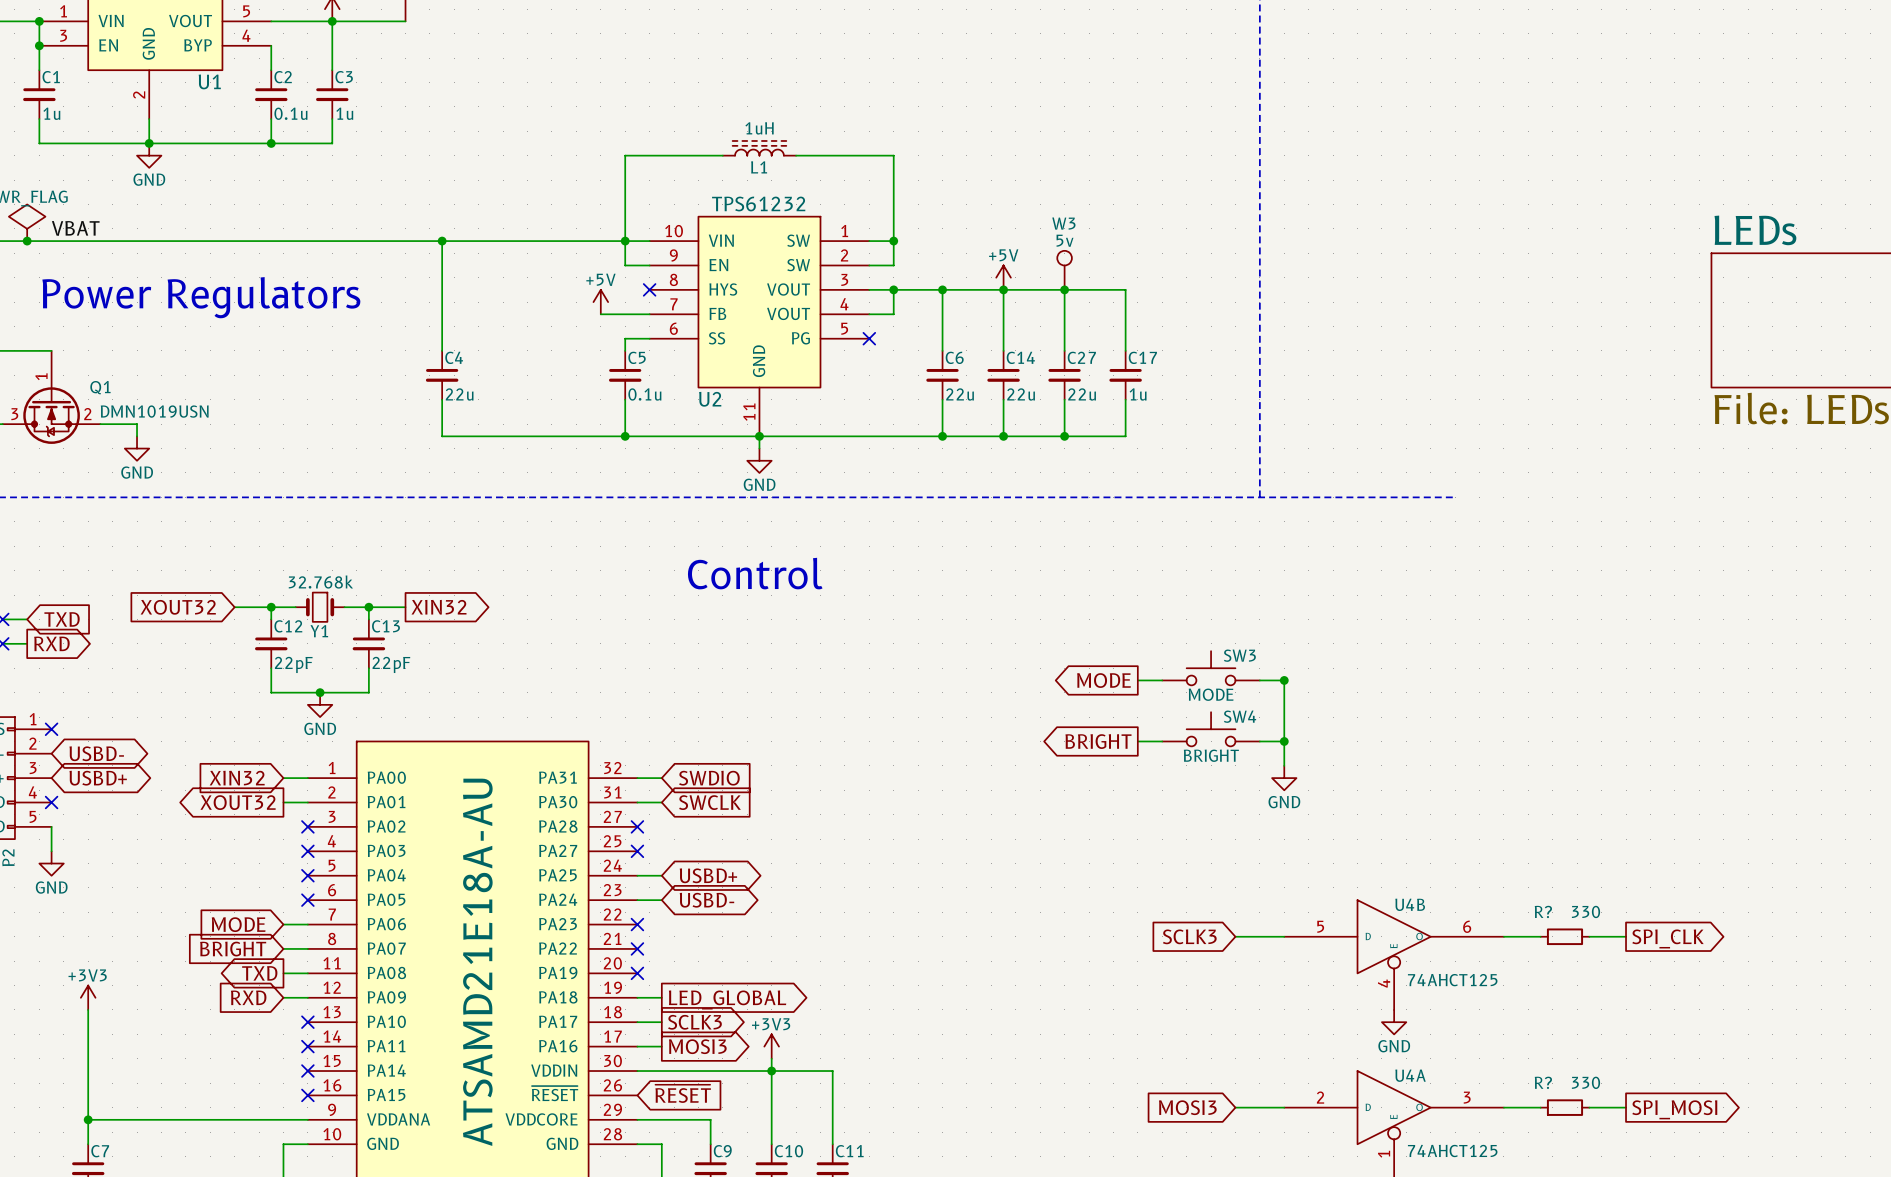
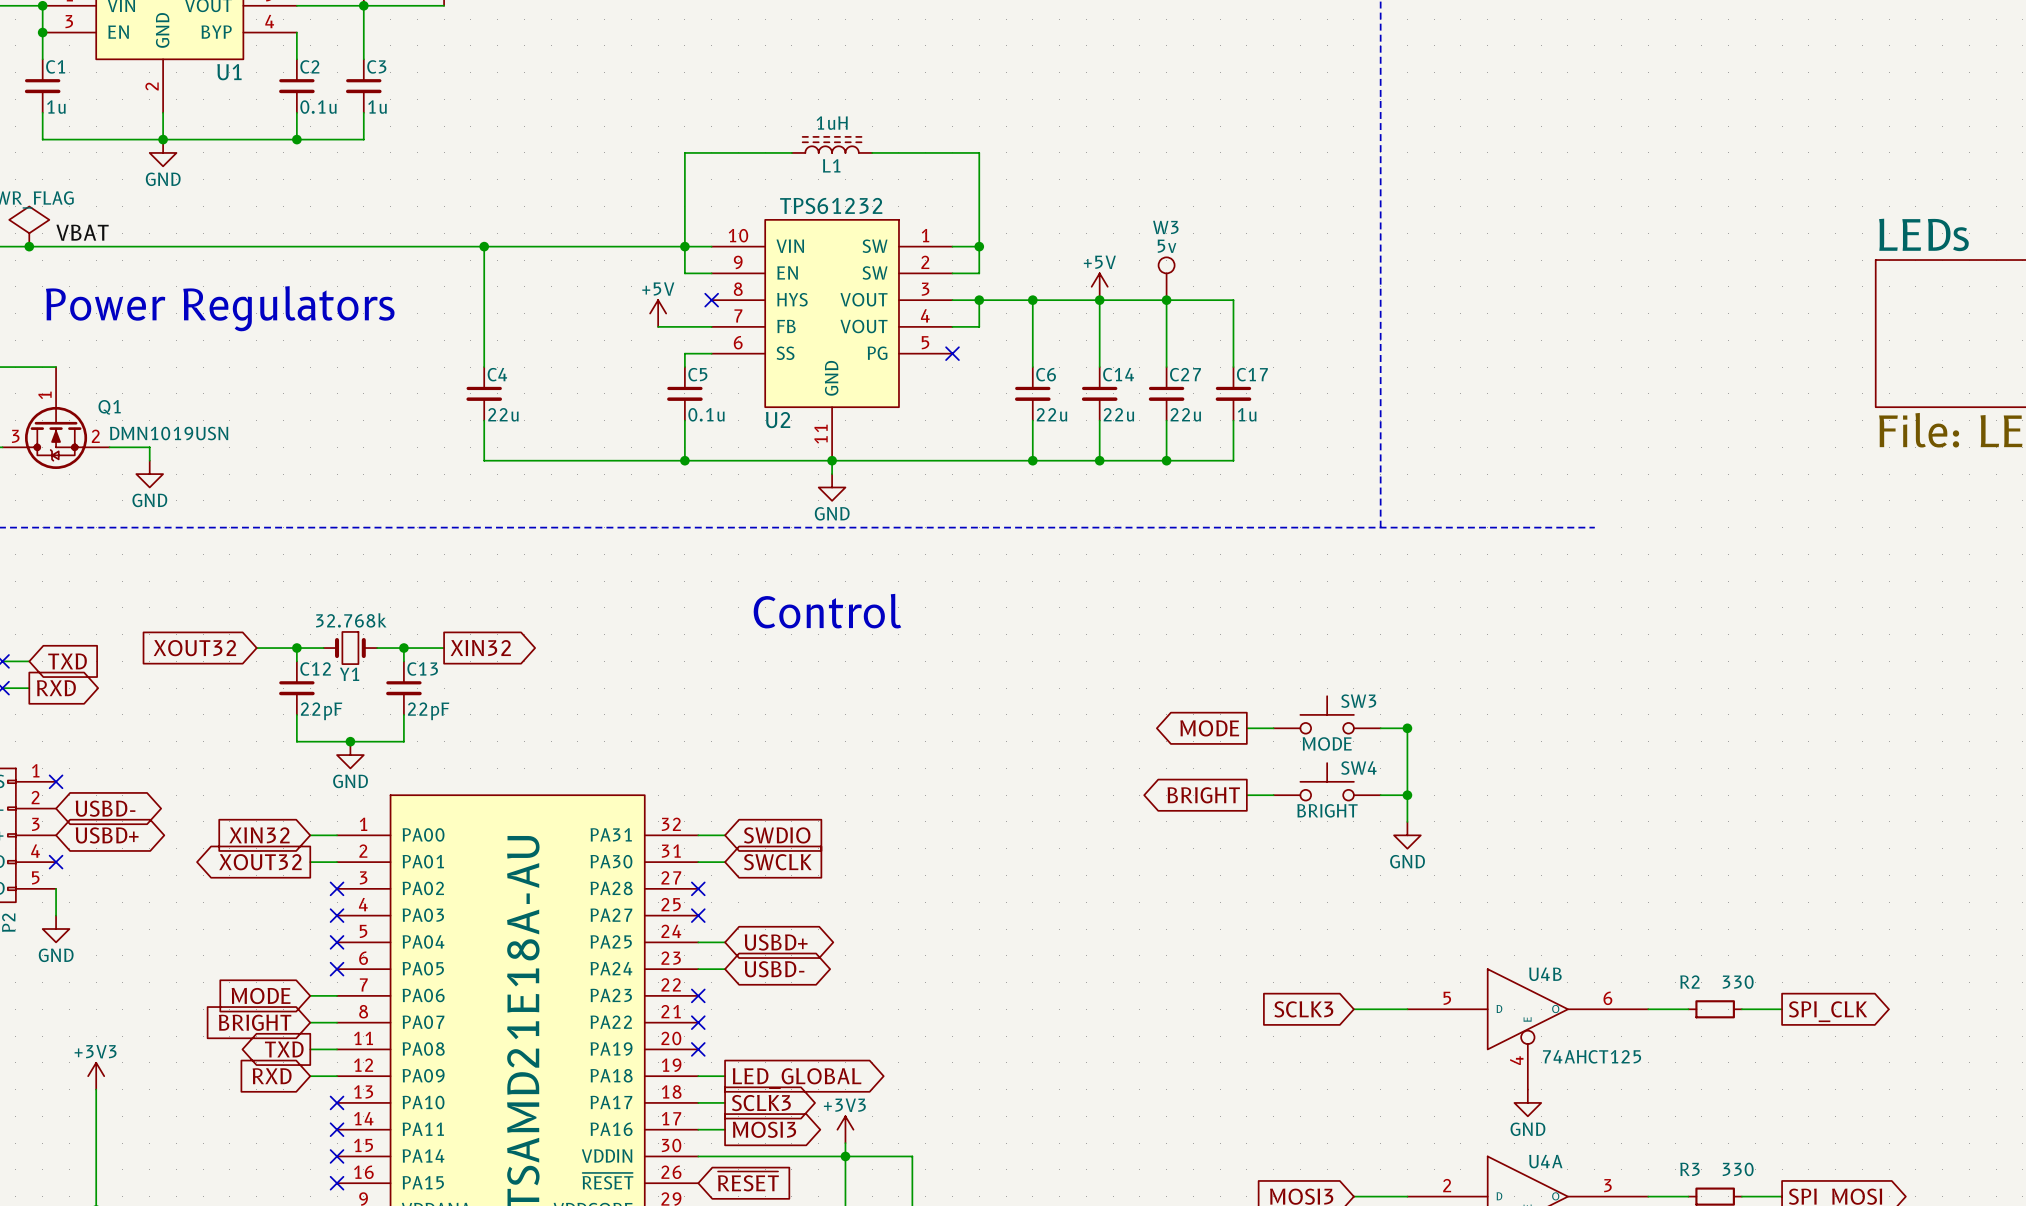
R? name: R? (1543, 911) -> R2 (1689, 982)
R? name: R? (1543, 1082) -> R3 (1689, 1169)

